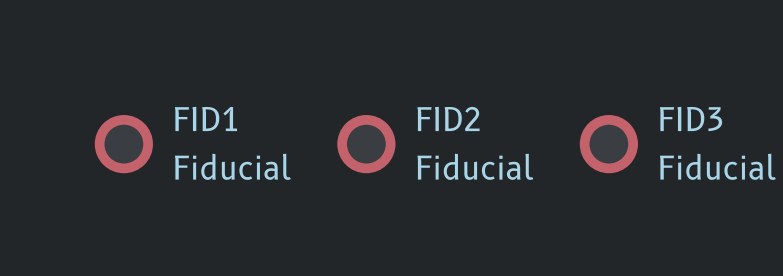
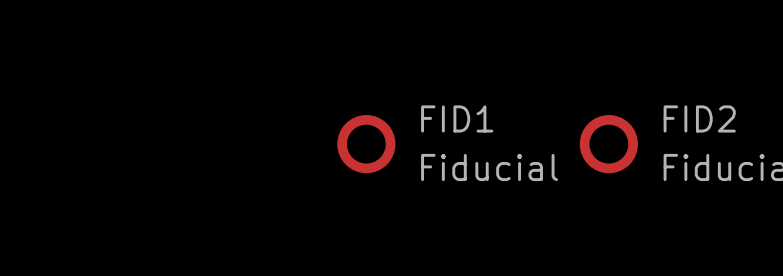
FID2 name: FID2 (448, 118) -> FID1 (457, 118)
FID3 name: FID3 (691, 118) -> FID2 (699, 118)
FID1: Fiducial (123, 144) -> none

